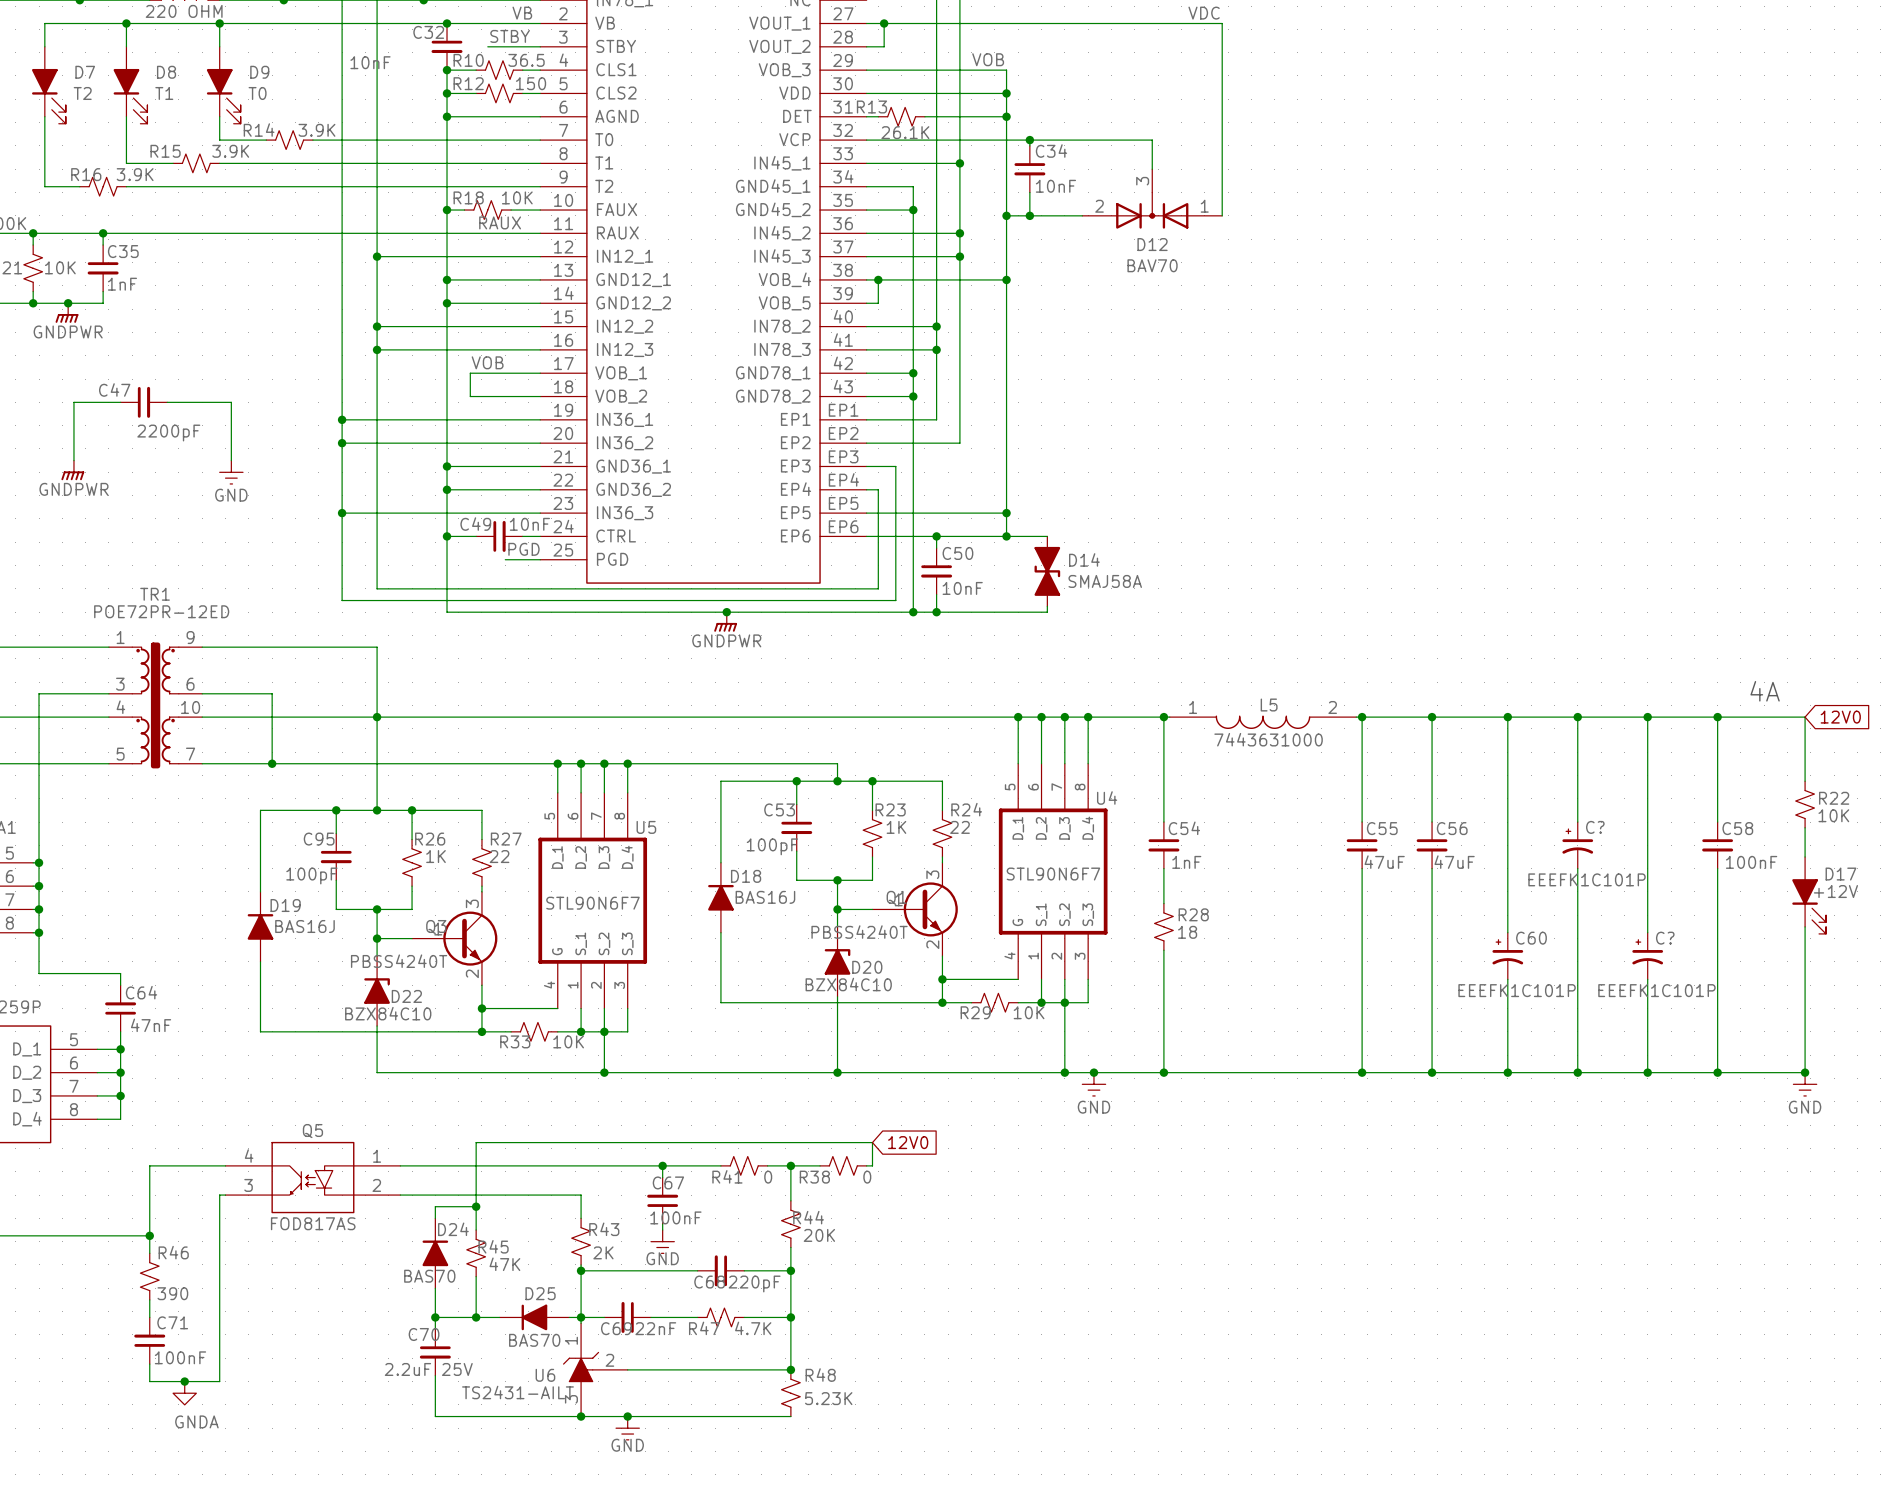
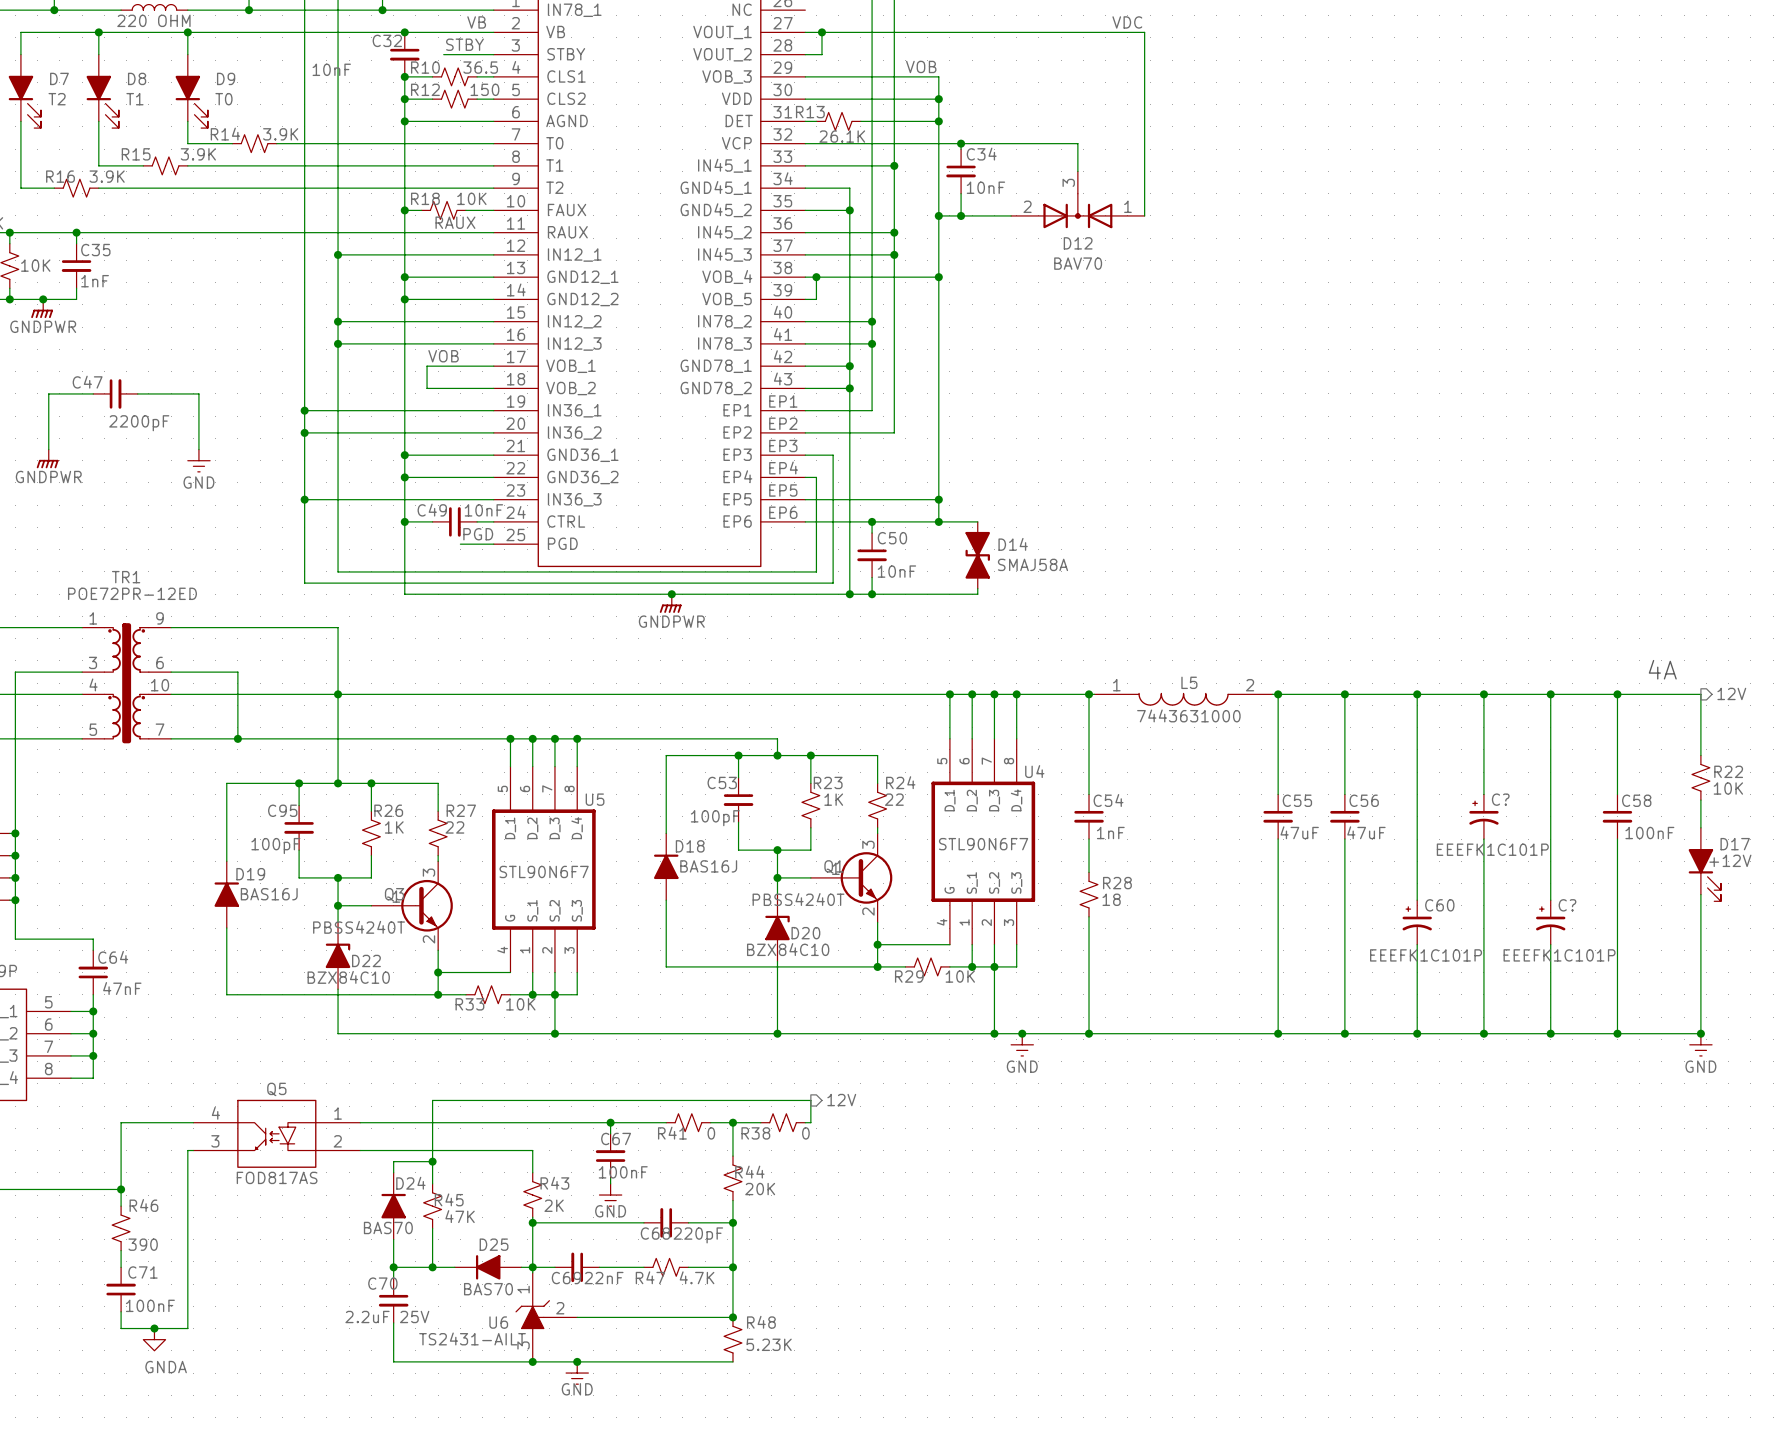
hierarchical label: none -> 12V (1731, 693)
global label: 12V0 (1840, 717) -> none
hierarchical label: none -> 12V (841, 1100)
global label: 12V0 (908, 1142) -> none

